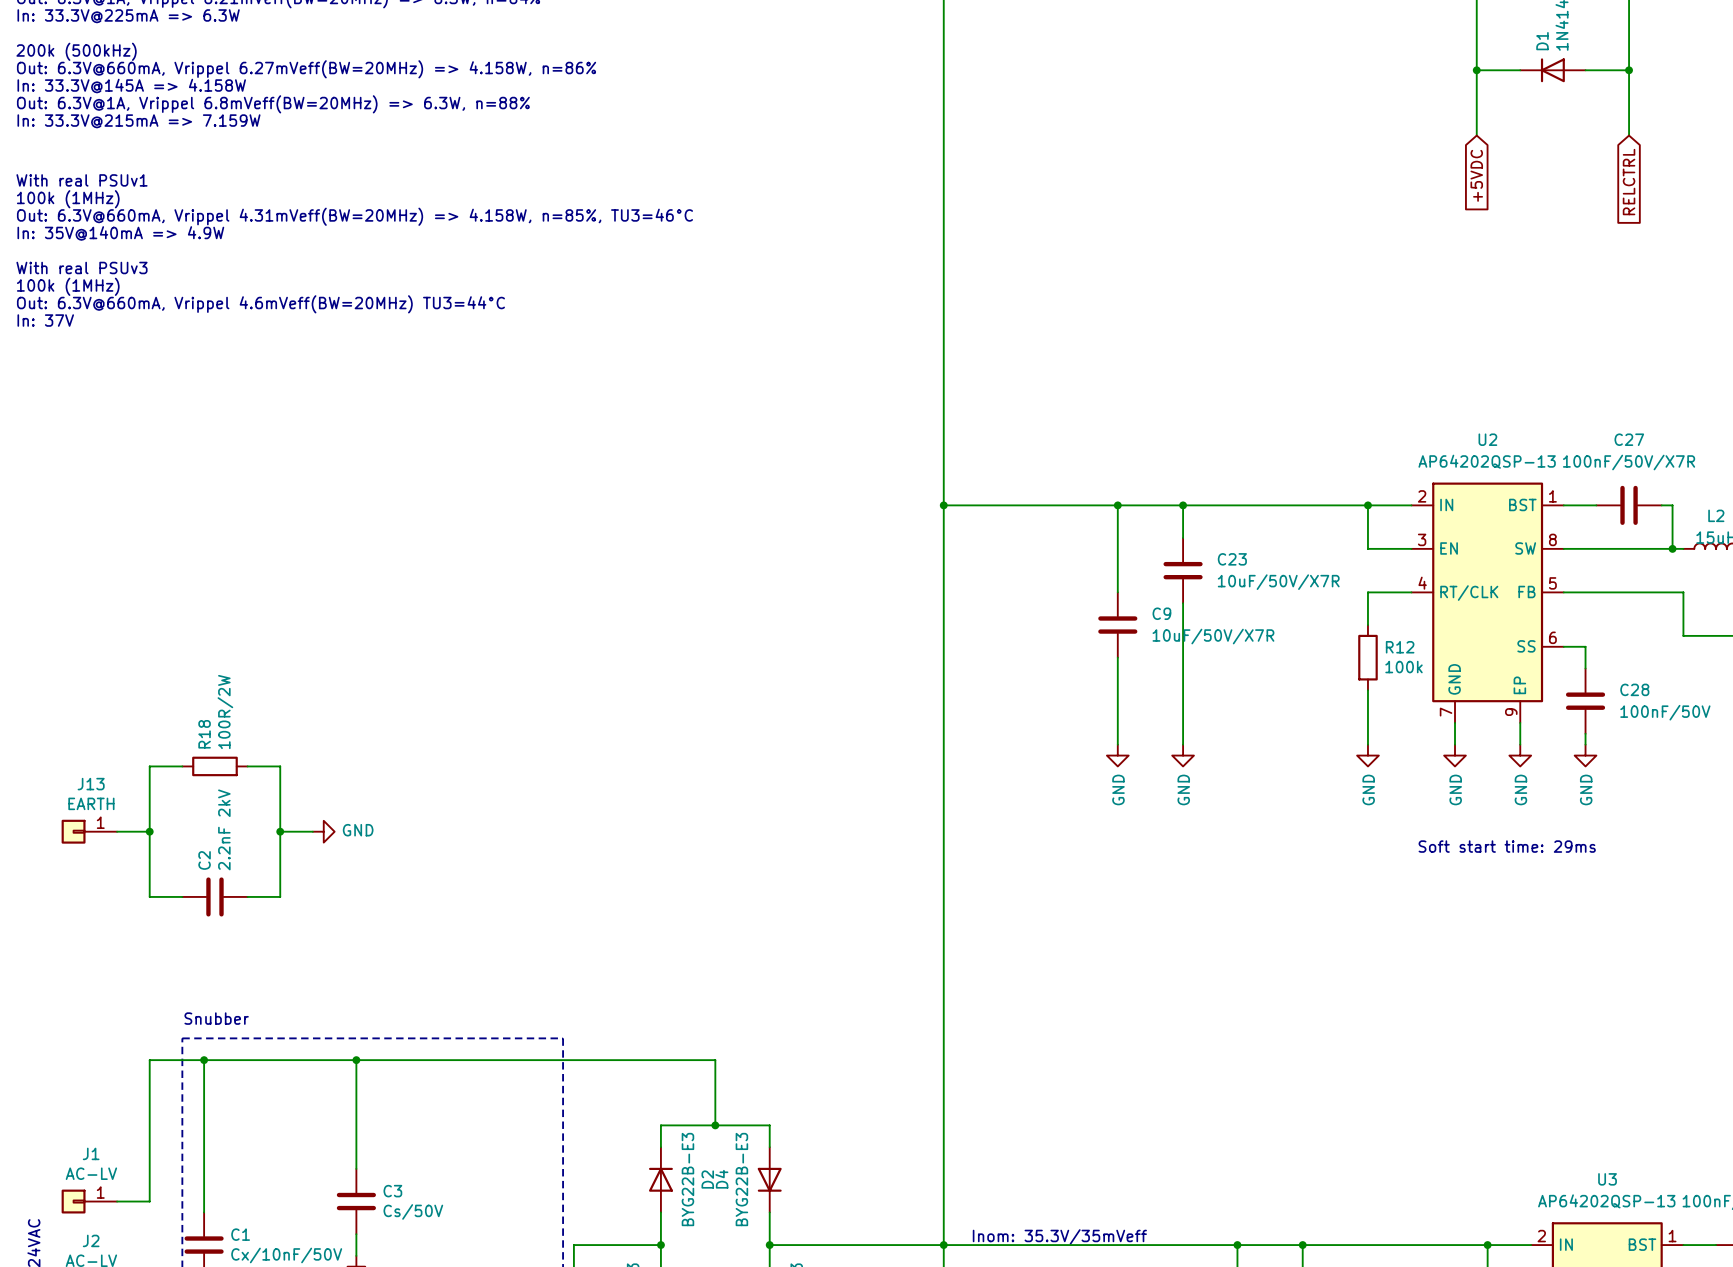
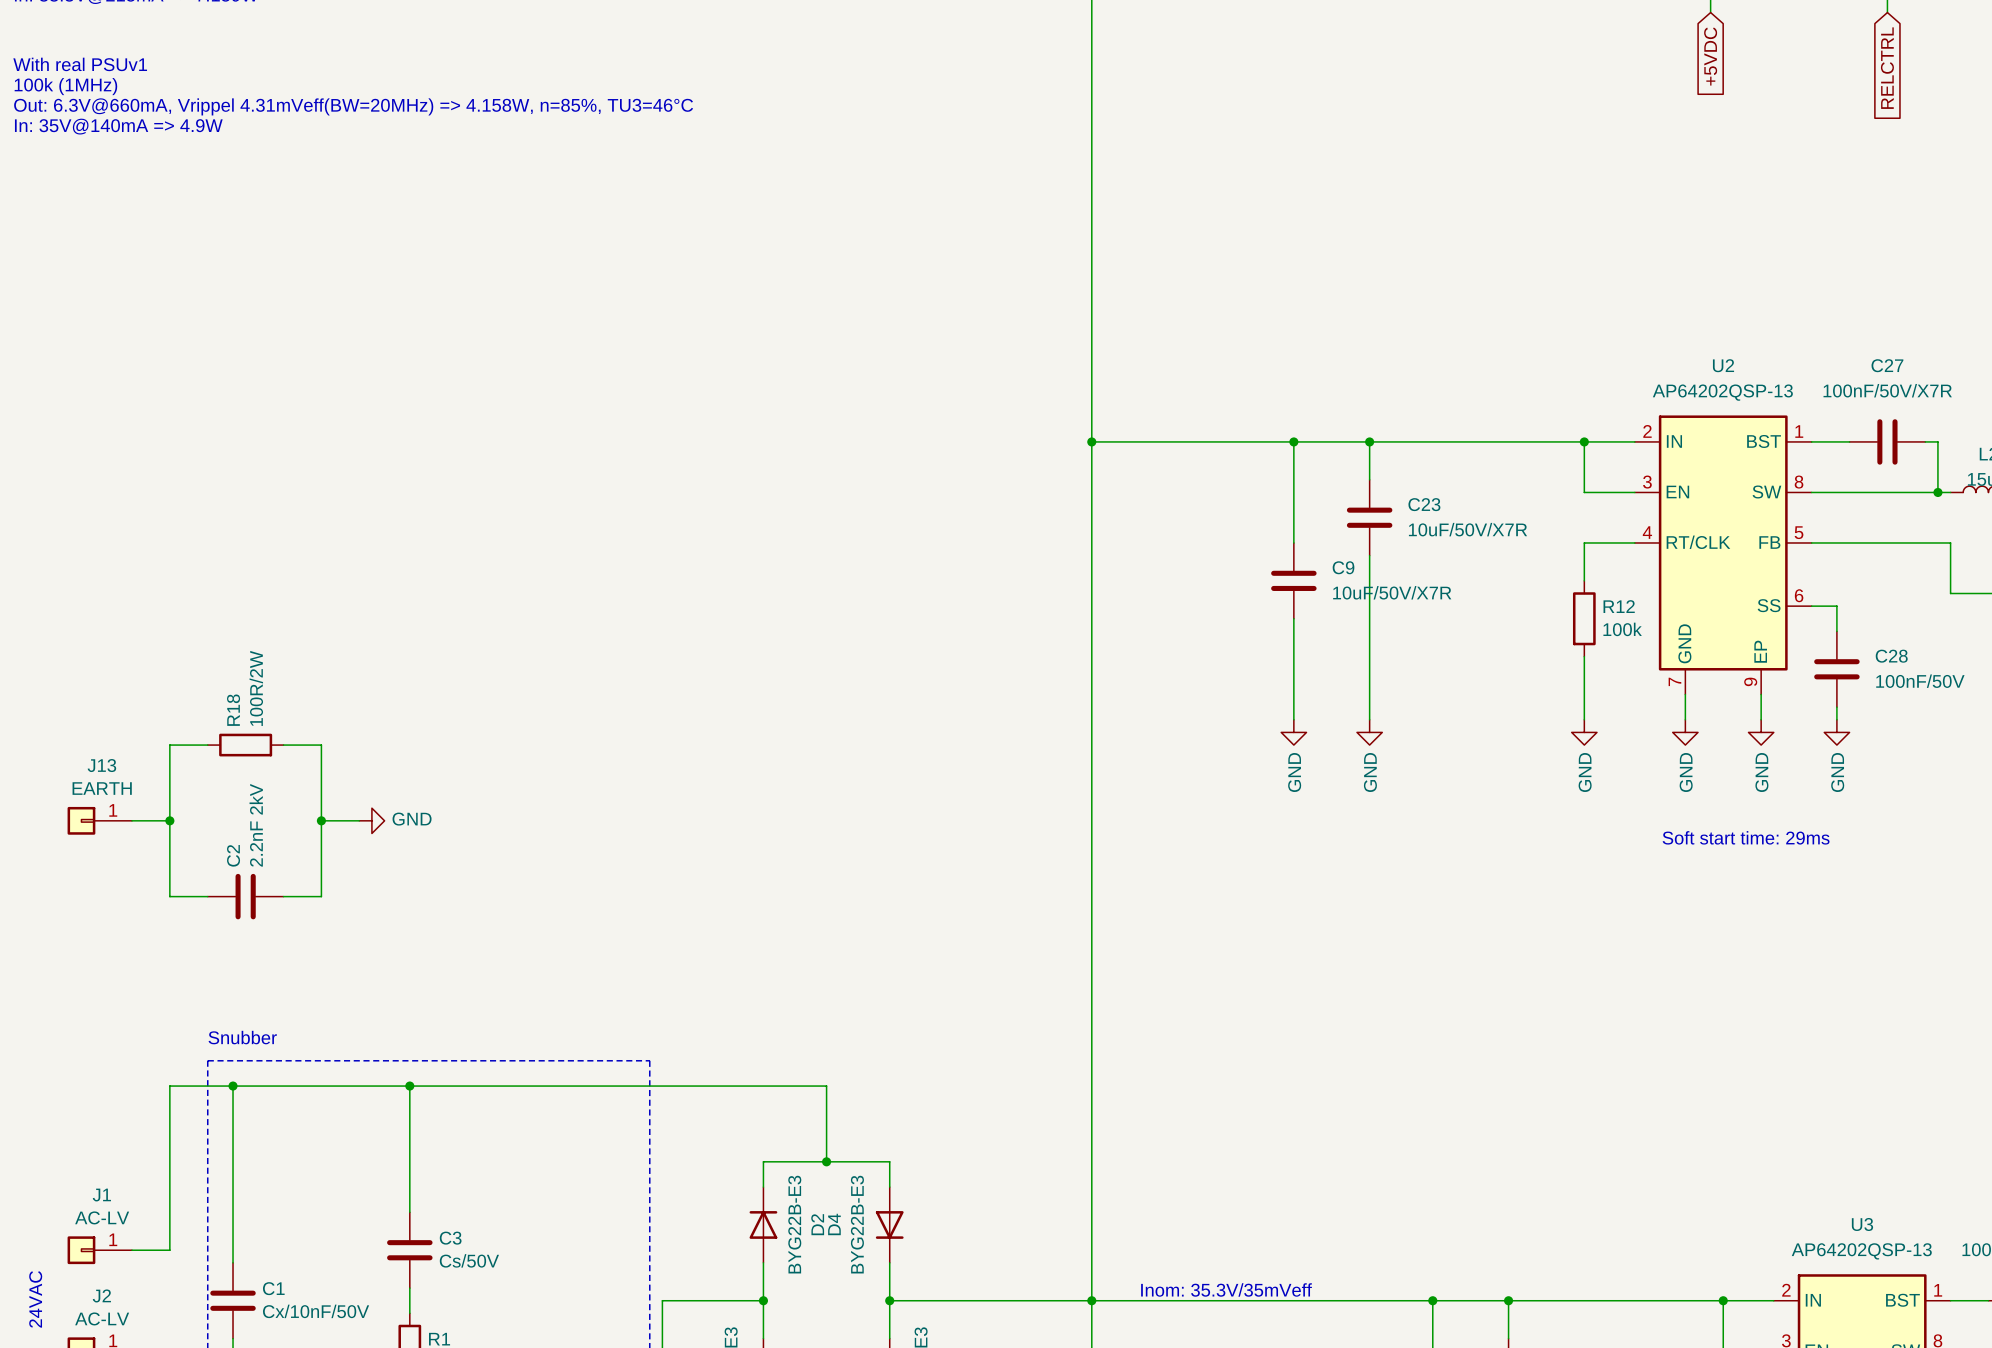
text: With real PSUv3 (81, 267) -> none
text: 100k (1MHz) (68, 286) -> none
text: Out: 6.3V@660mA, Vrippel 4.6mVeff(BW=20MHz) TU3=44°C (260, 304) -> none
text: In: 37V (45, 320) -> none

